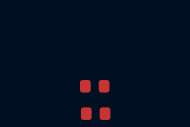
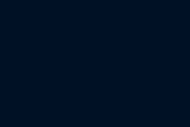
part: (94, 86) -> none
part: (95, 113) -> none

